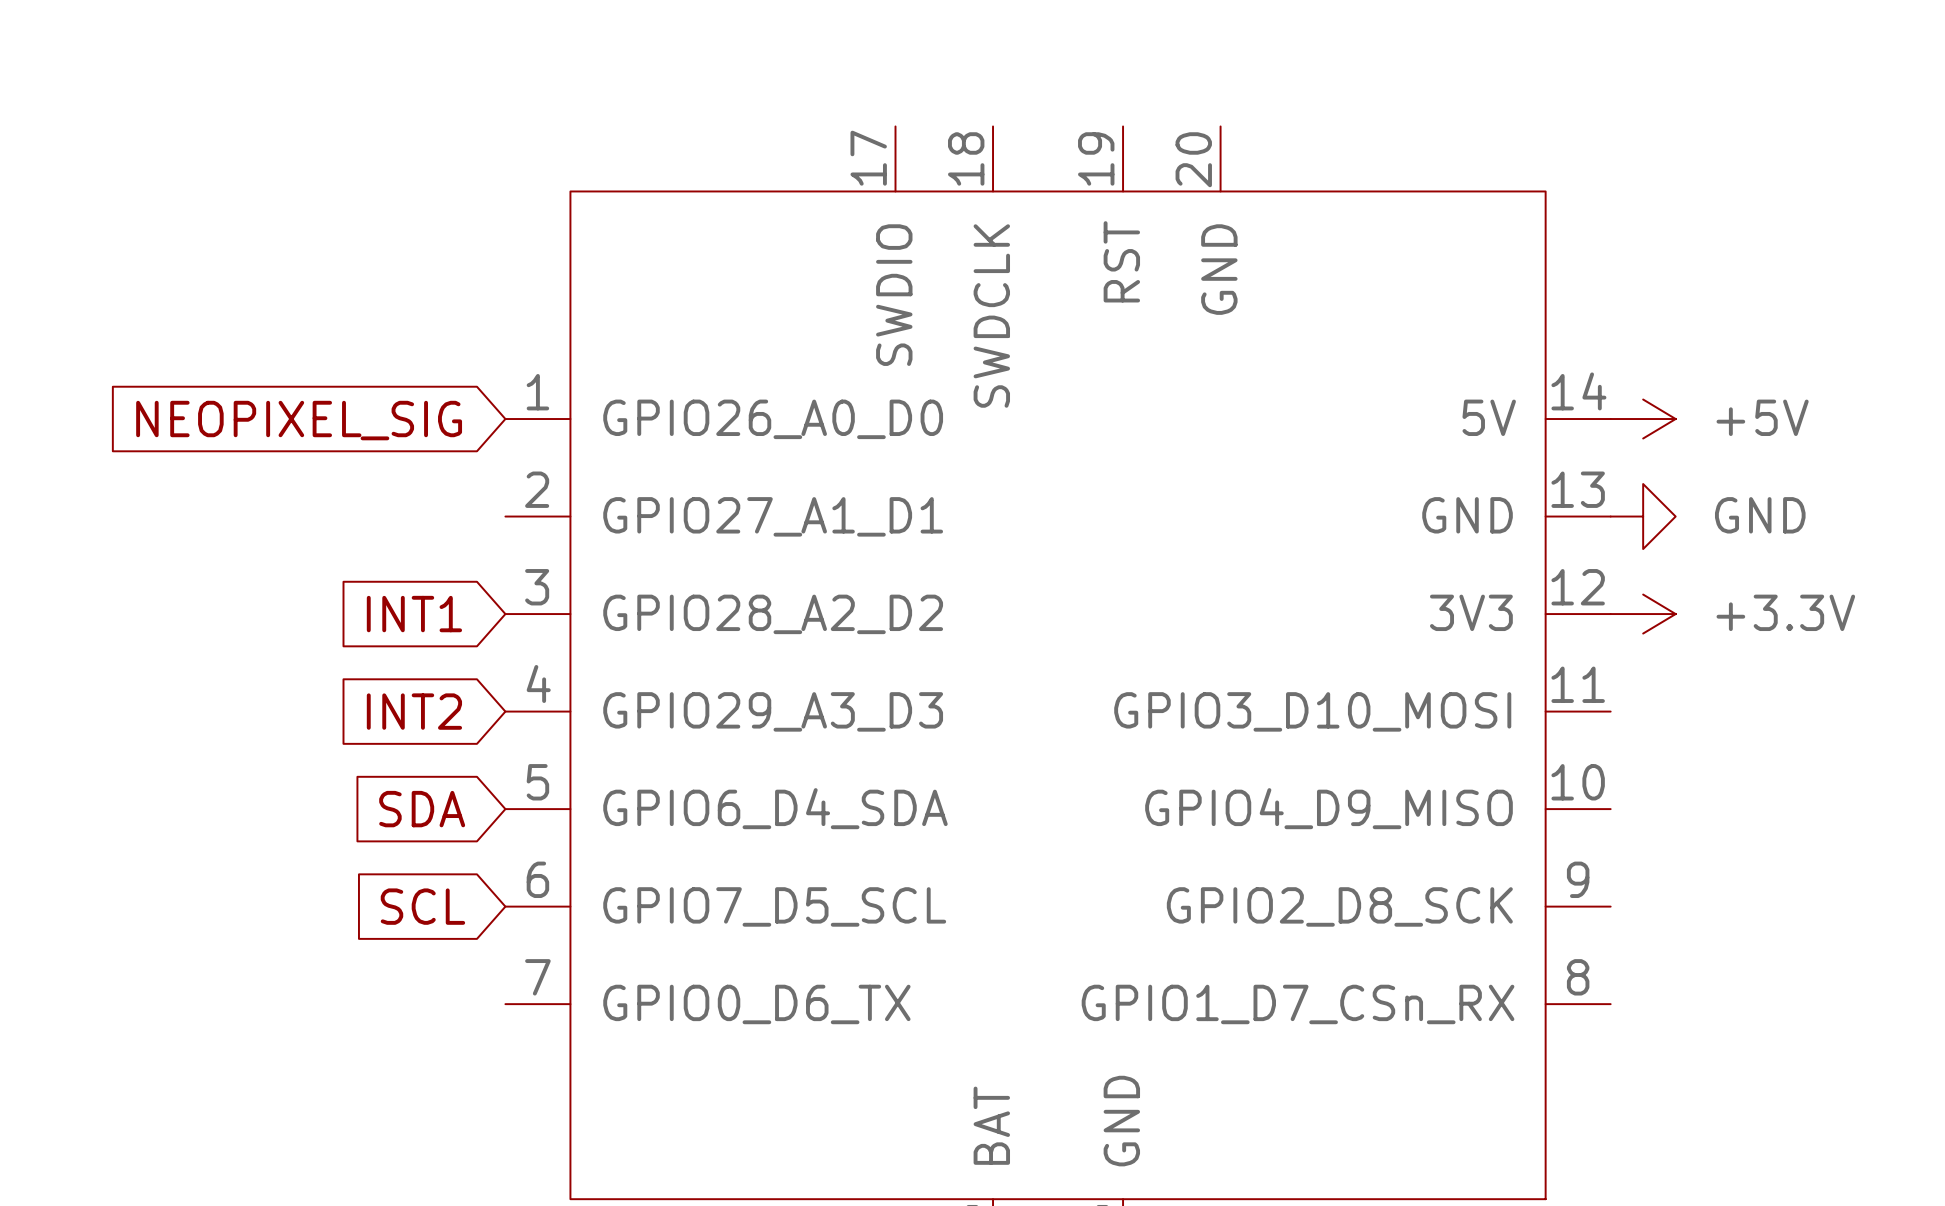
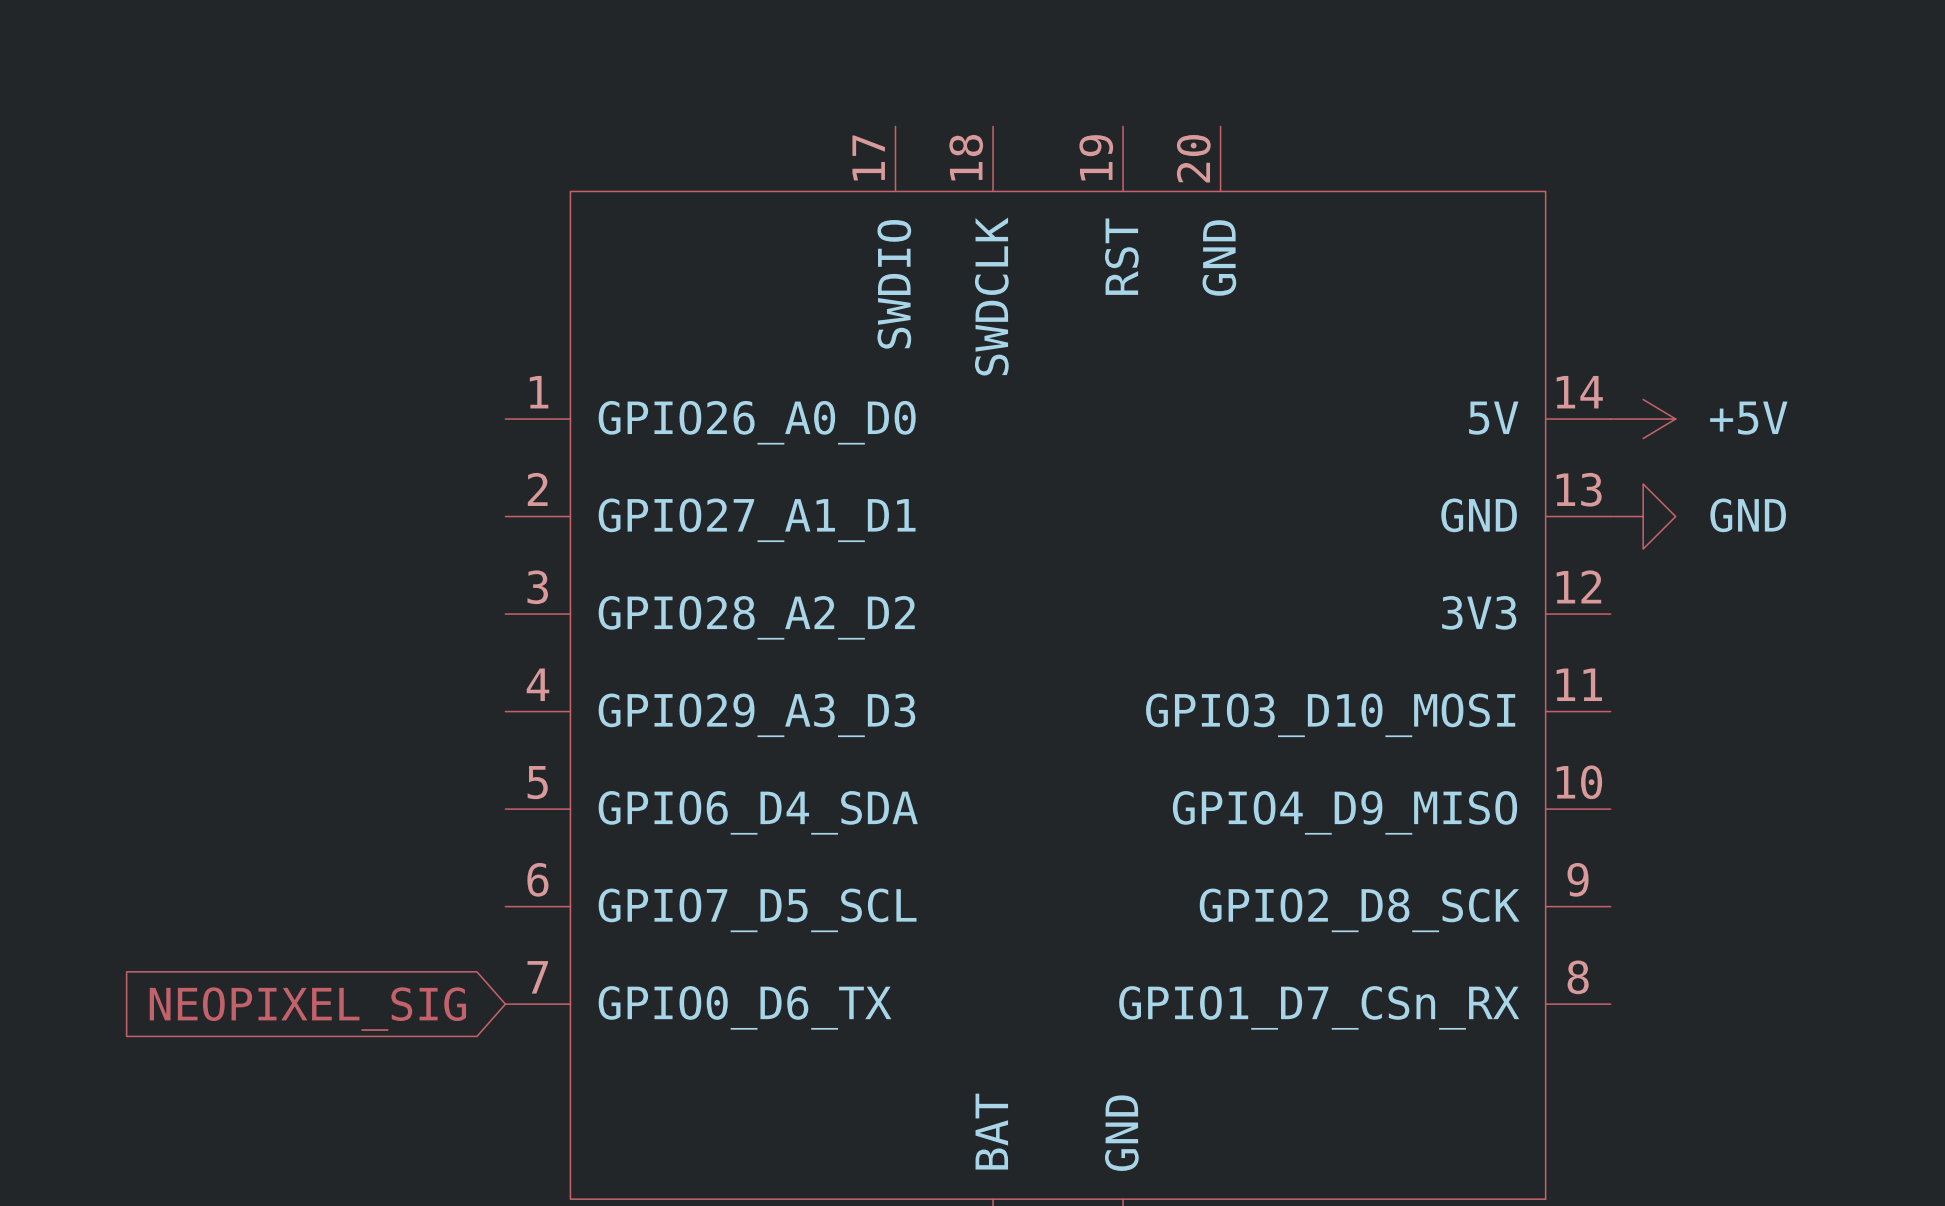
global label position: NEOPIXEL_SIG (299, 420) -> NEOPIXEL_SIG (307, 1009)
global label: INT1 (414, 614) -> none
power symbol: +3.3V (1643, 614) -> none
global label: INT2 (414, 711) -> none
global label: SDA (422, 809) -> none
global label: SCL (422, 906) -> none

